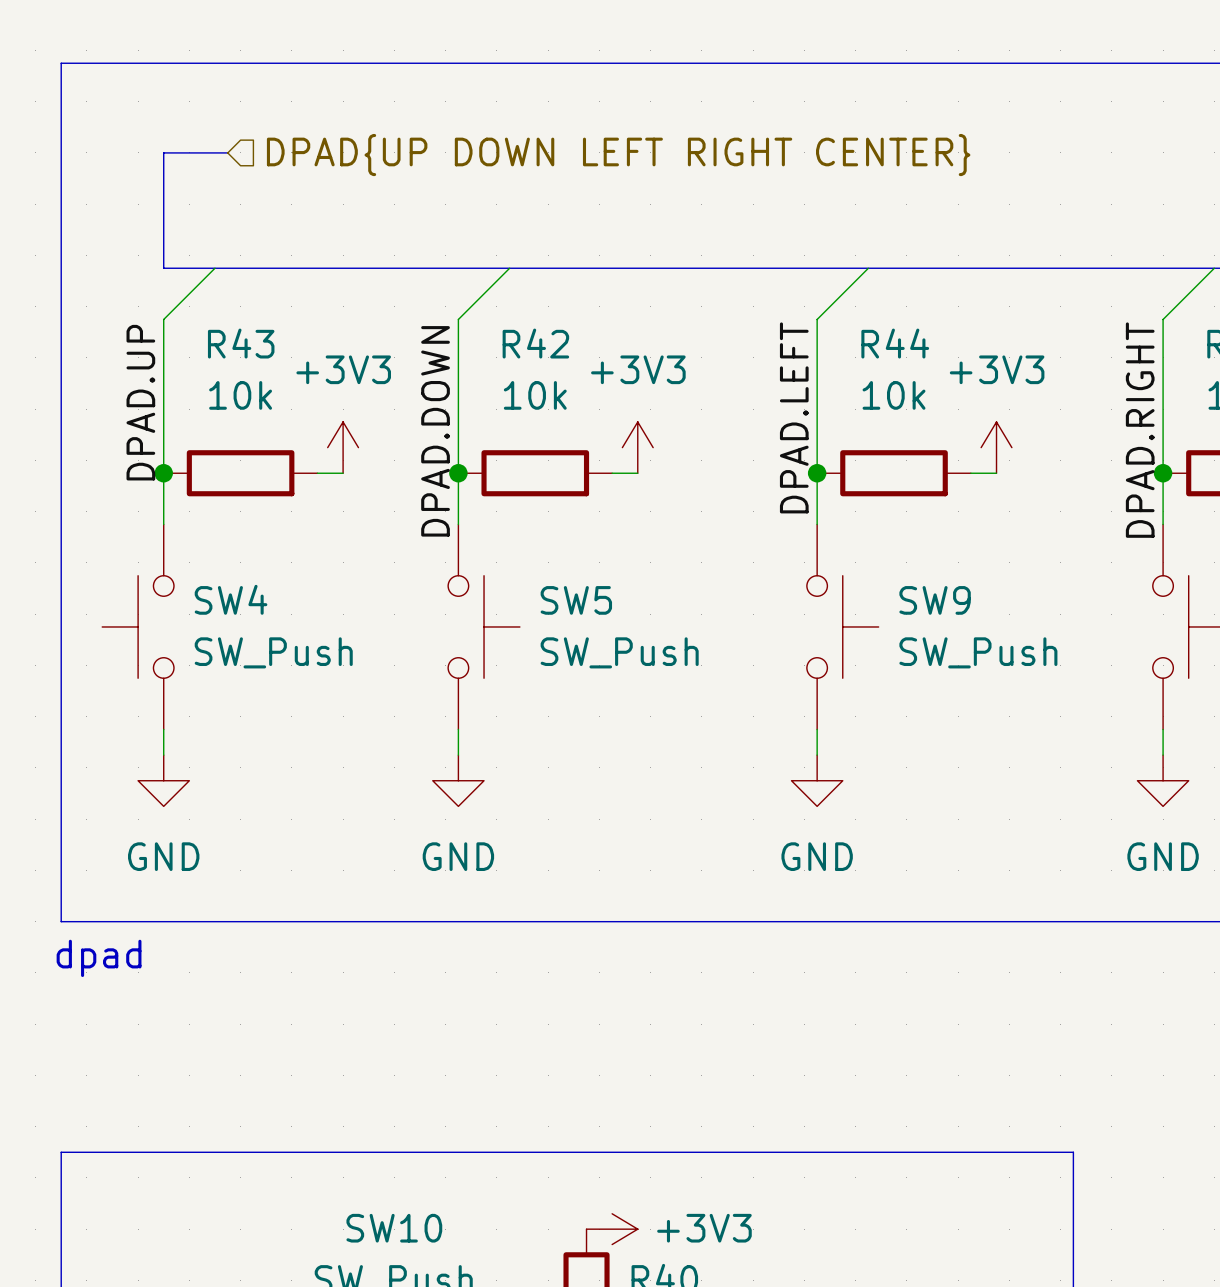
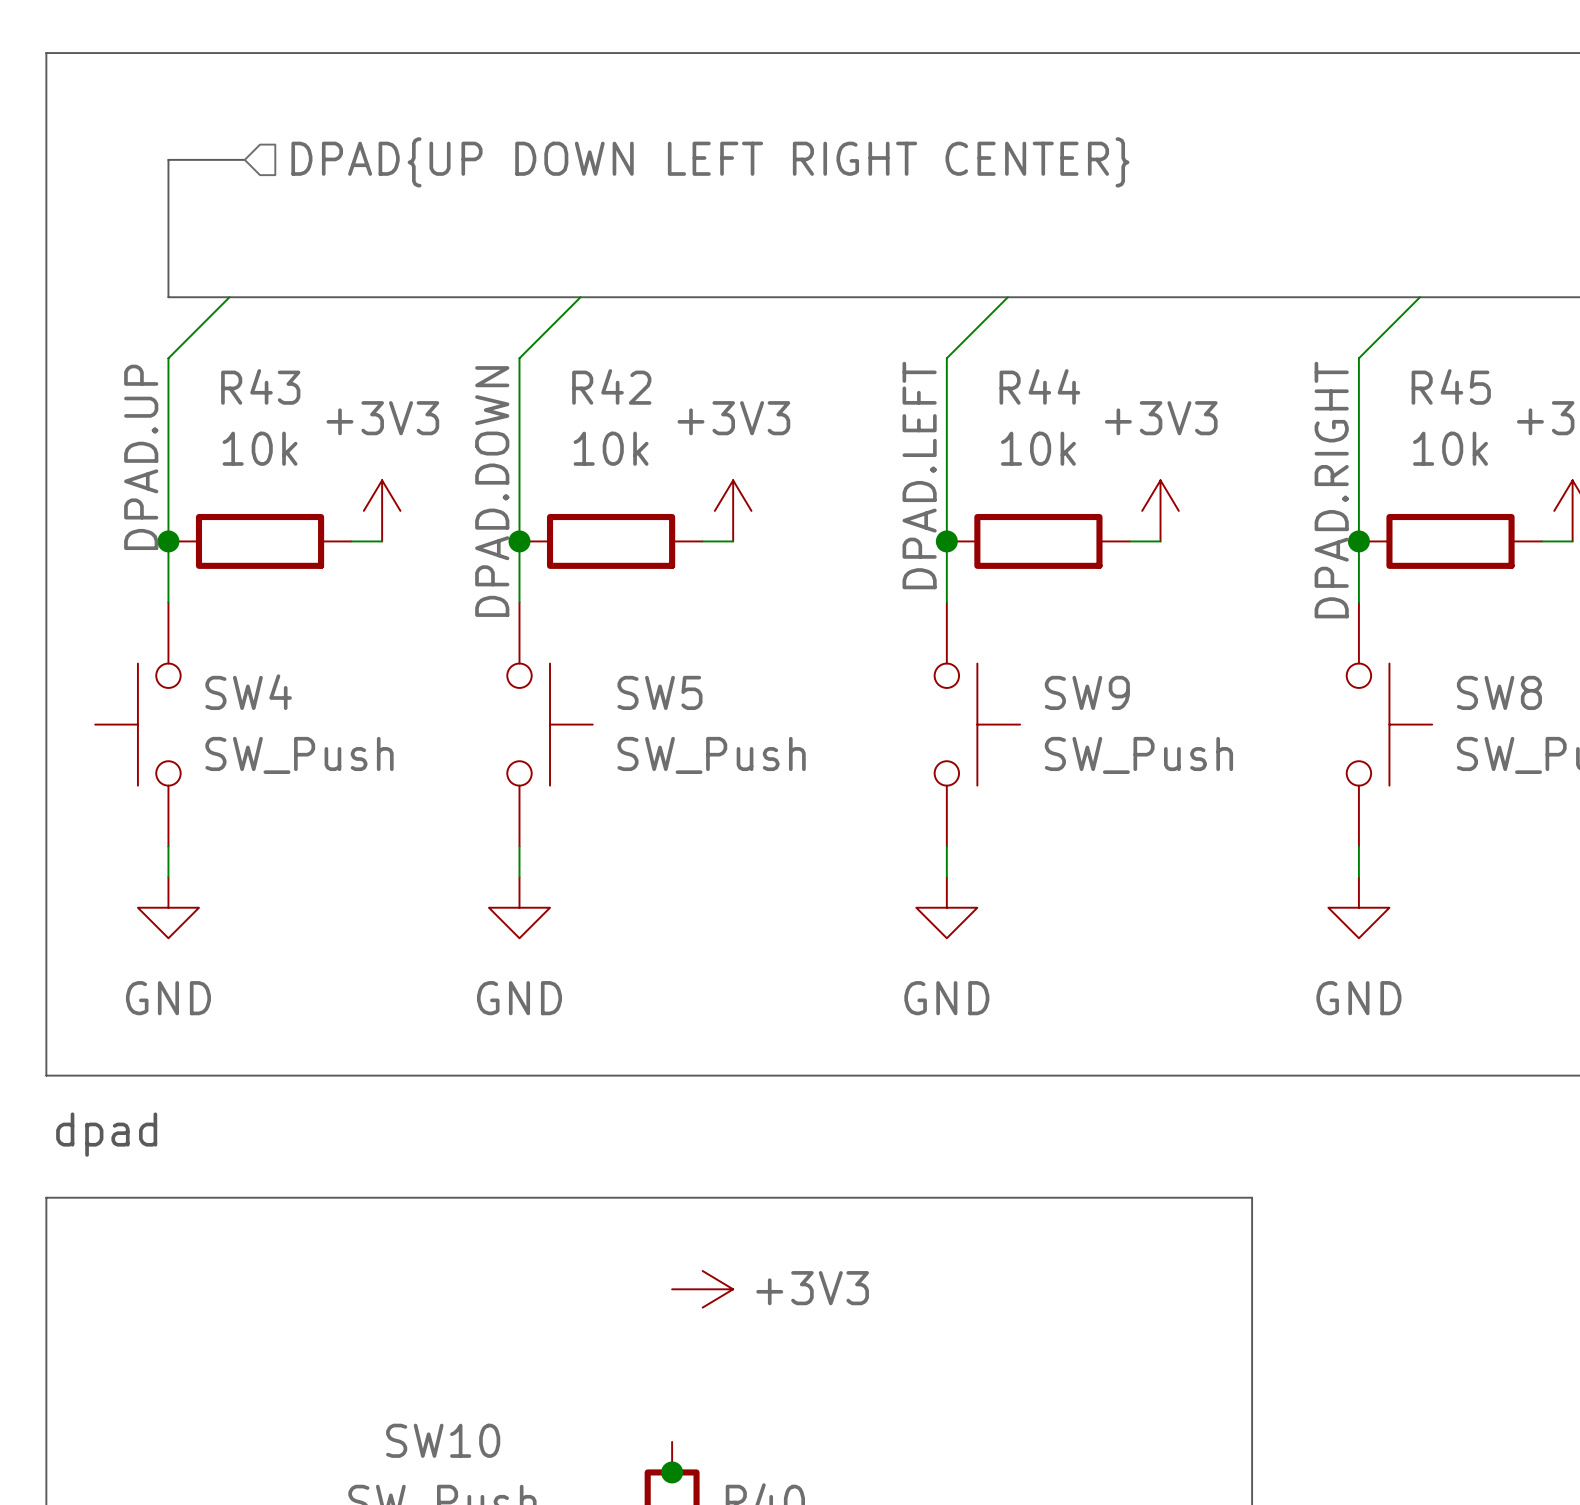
text position: dpad (99, 958) -> dpad (106, 1134)
power symbol: none -> +3V3 (702, 1289)
line: (61, 1152) (1073, 1152) -> (46, 1350) (46, 1197) (1252, 1197) (1252, 1350)
power symbol: +3V3 (612, 1229) -> none
junction: none -> (672, 1472)

